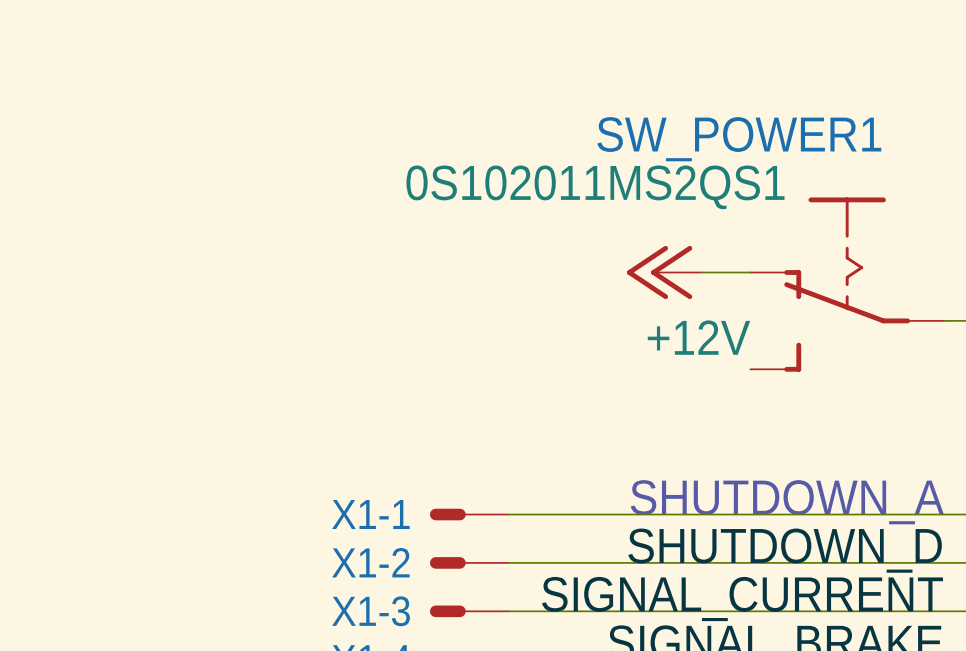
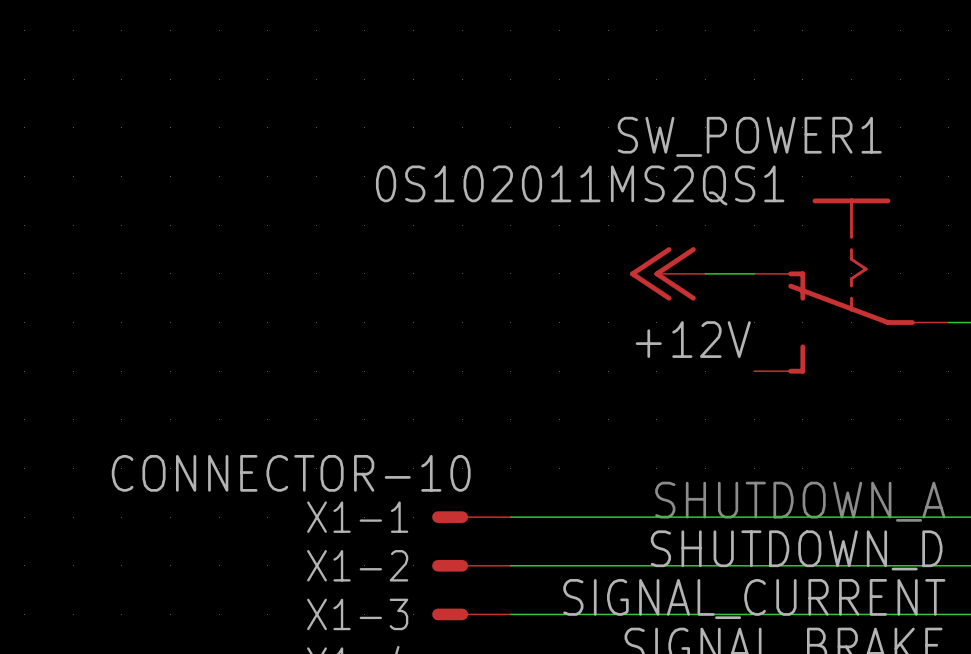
X1-1 value: none -> CONNECTOR-10 (291, 473)

